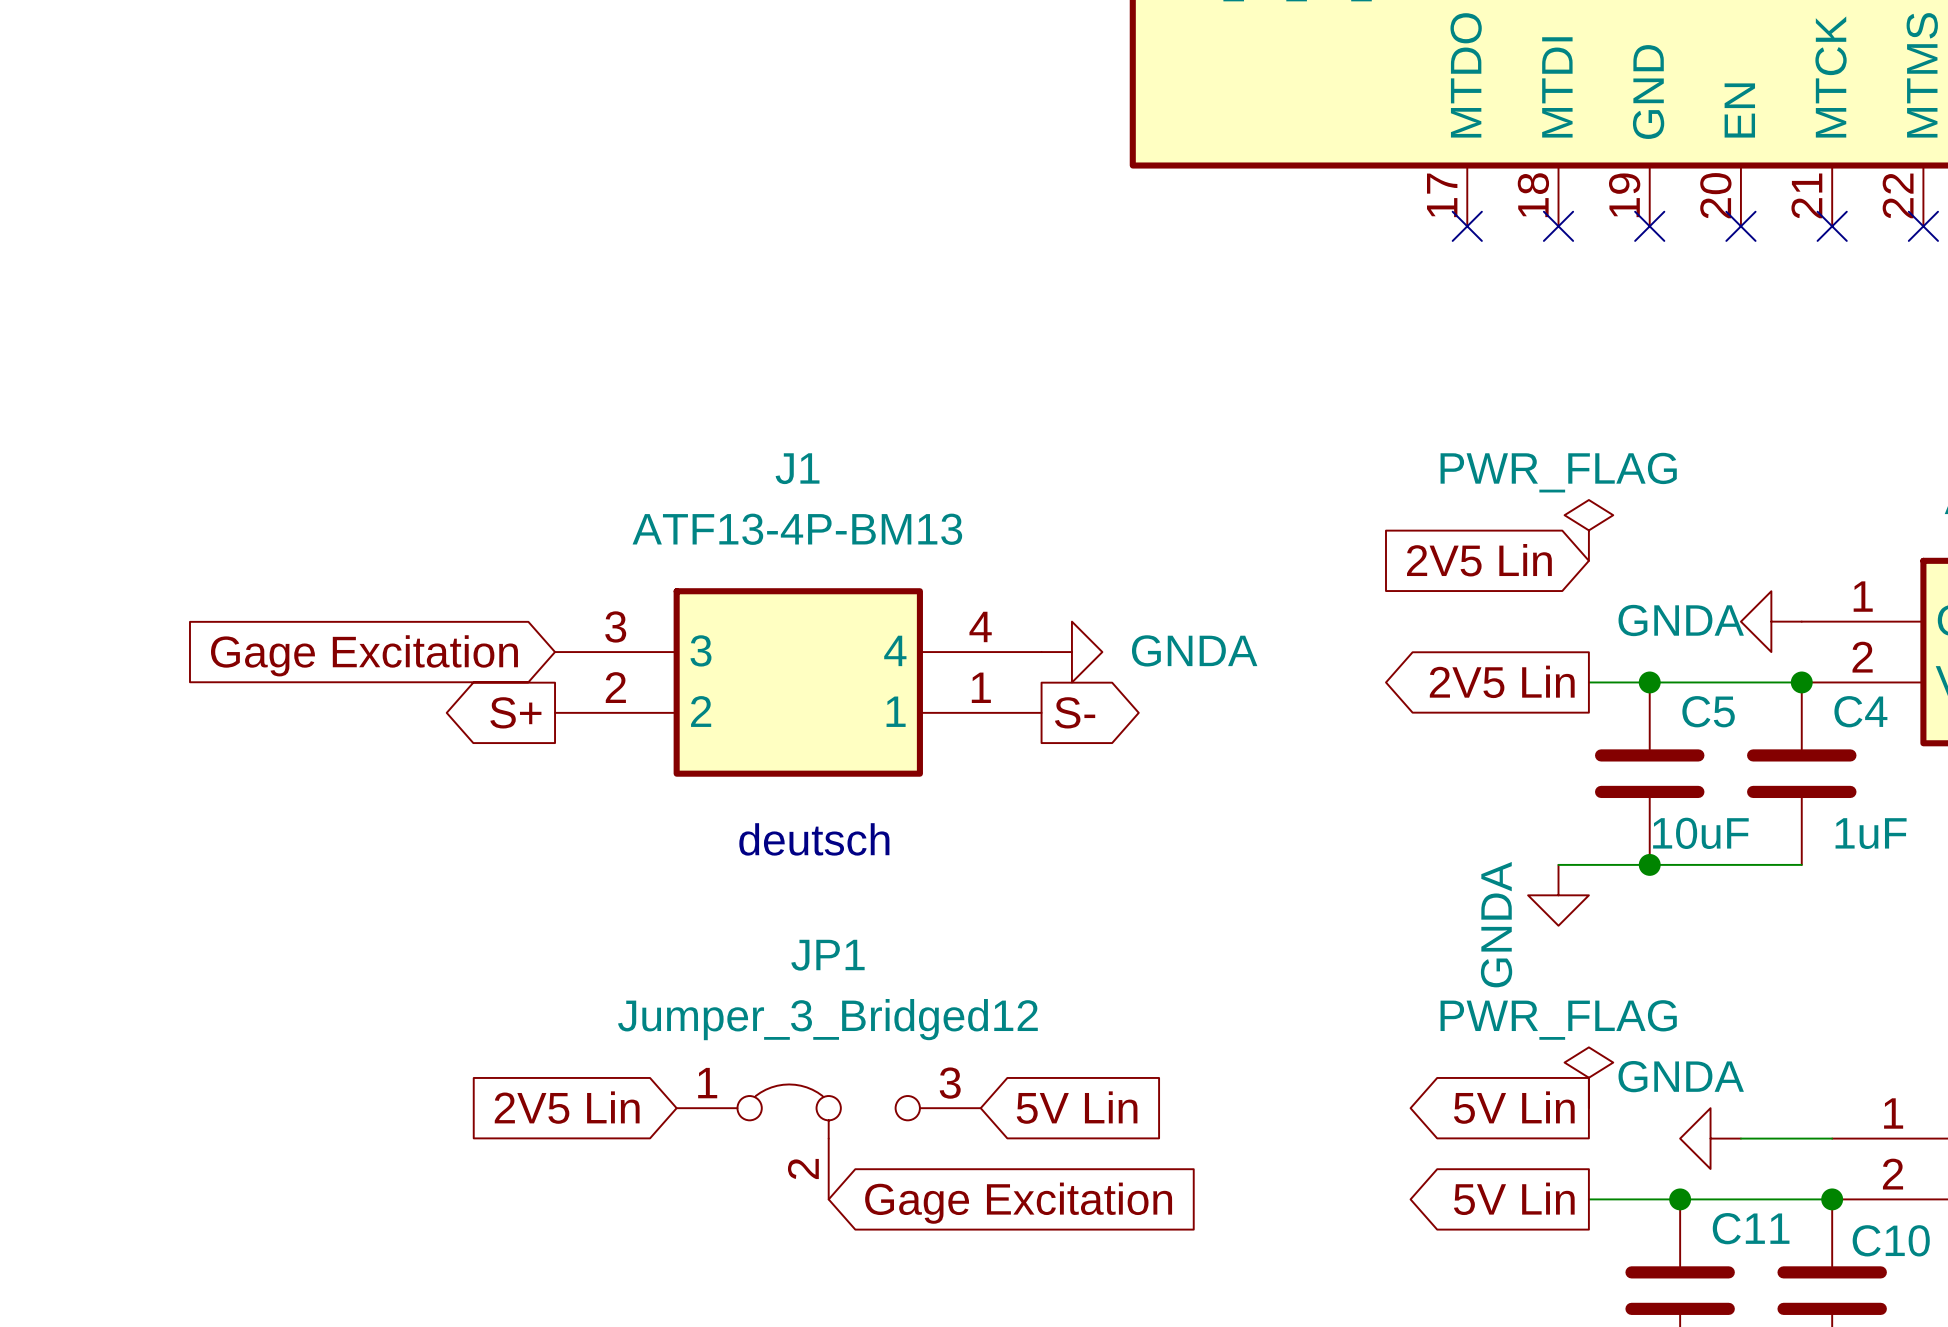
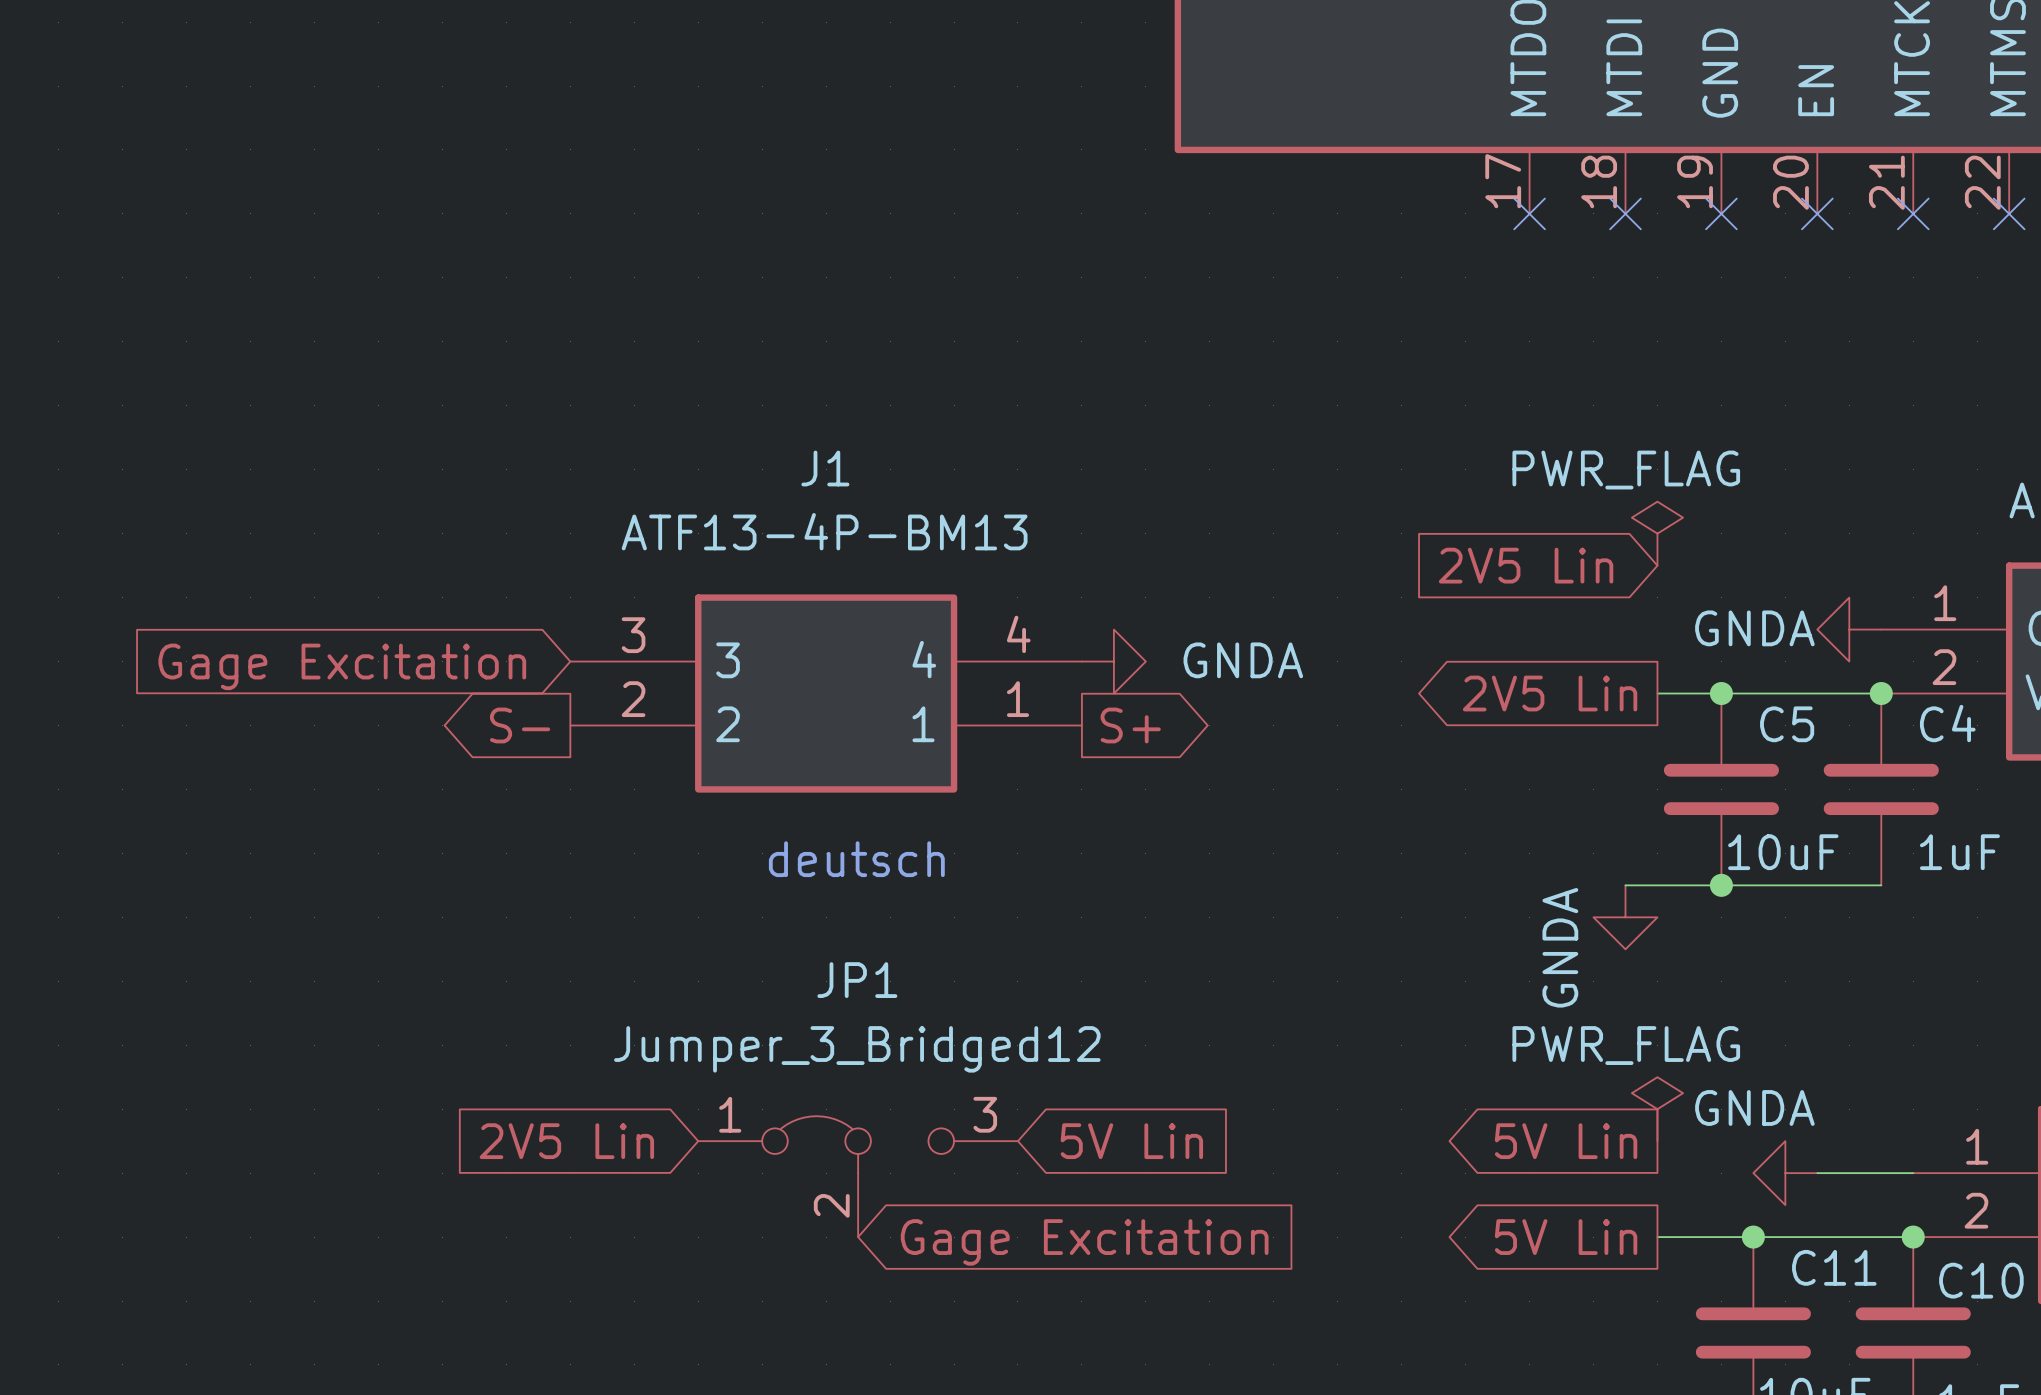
global label: S+ (515, 712) -> S- (520, 725)
global label: S- (1075, 712) -> S+ (1130, 725)

